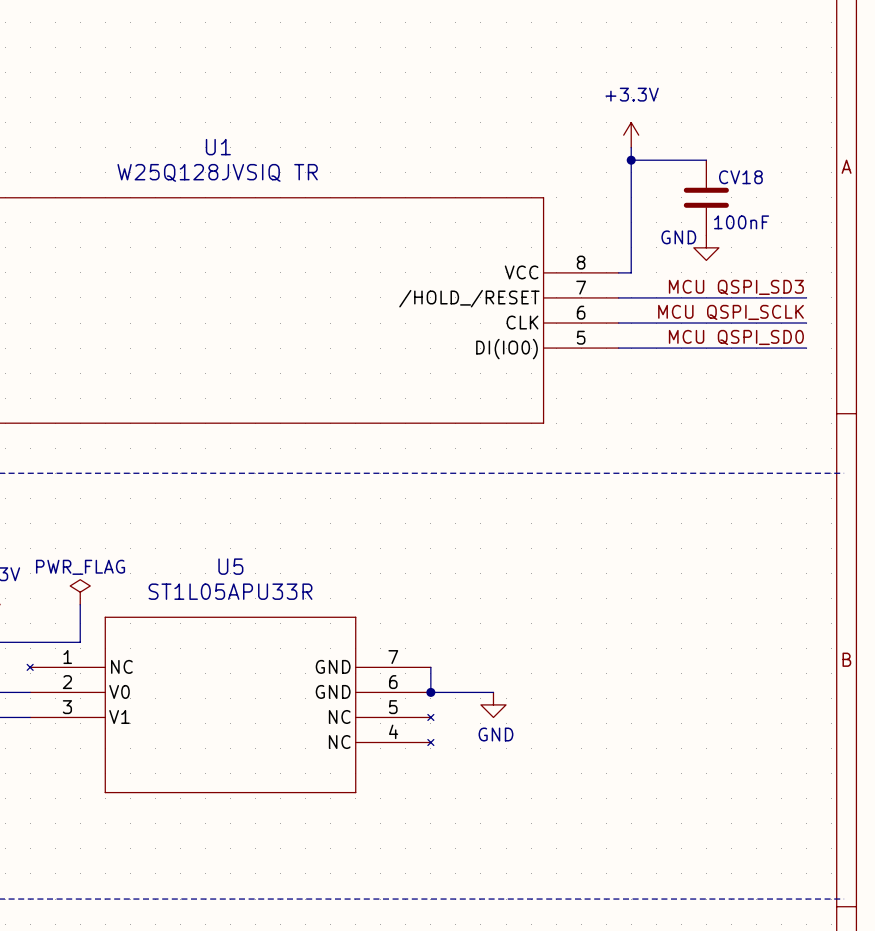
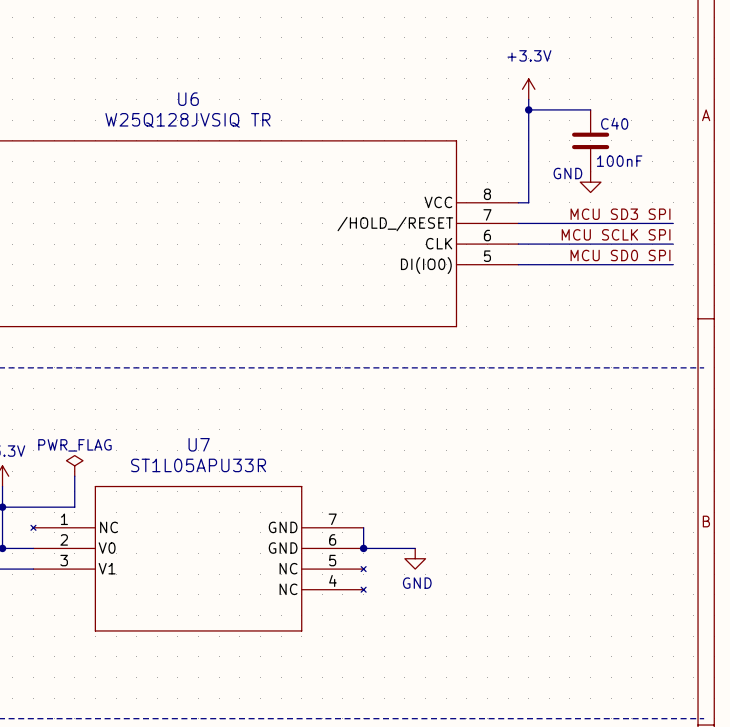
U1 name: U1 (218, 147) -> U6 (188, 99)
CV18 name: CV18 (740, 177) -> C40 (614, 123)
label: MCU QSPI_SD3 (736, 287) -> MCU SD3 SPI (620, 214)
label: MCU QSPI_SCLK (731, 312) -> MCU SCLK SPI (616, 234)
label: MCU QSPI_SD0 (736, 337) -> MCU SD0 SPI (620, 255)
U5 name: U5 (230, 566) -> U7 (199, 444)

